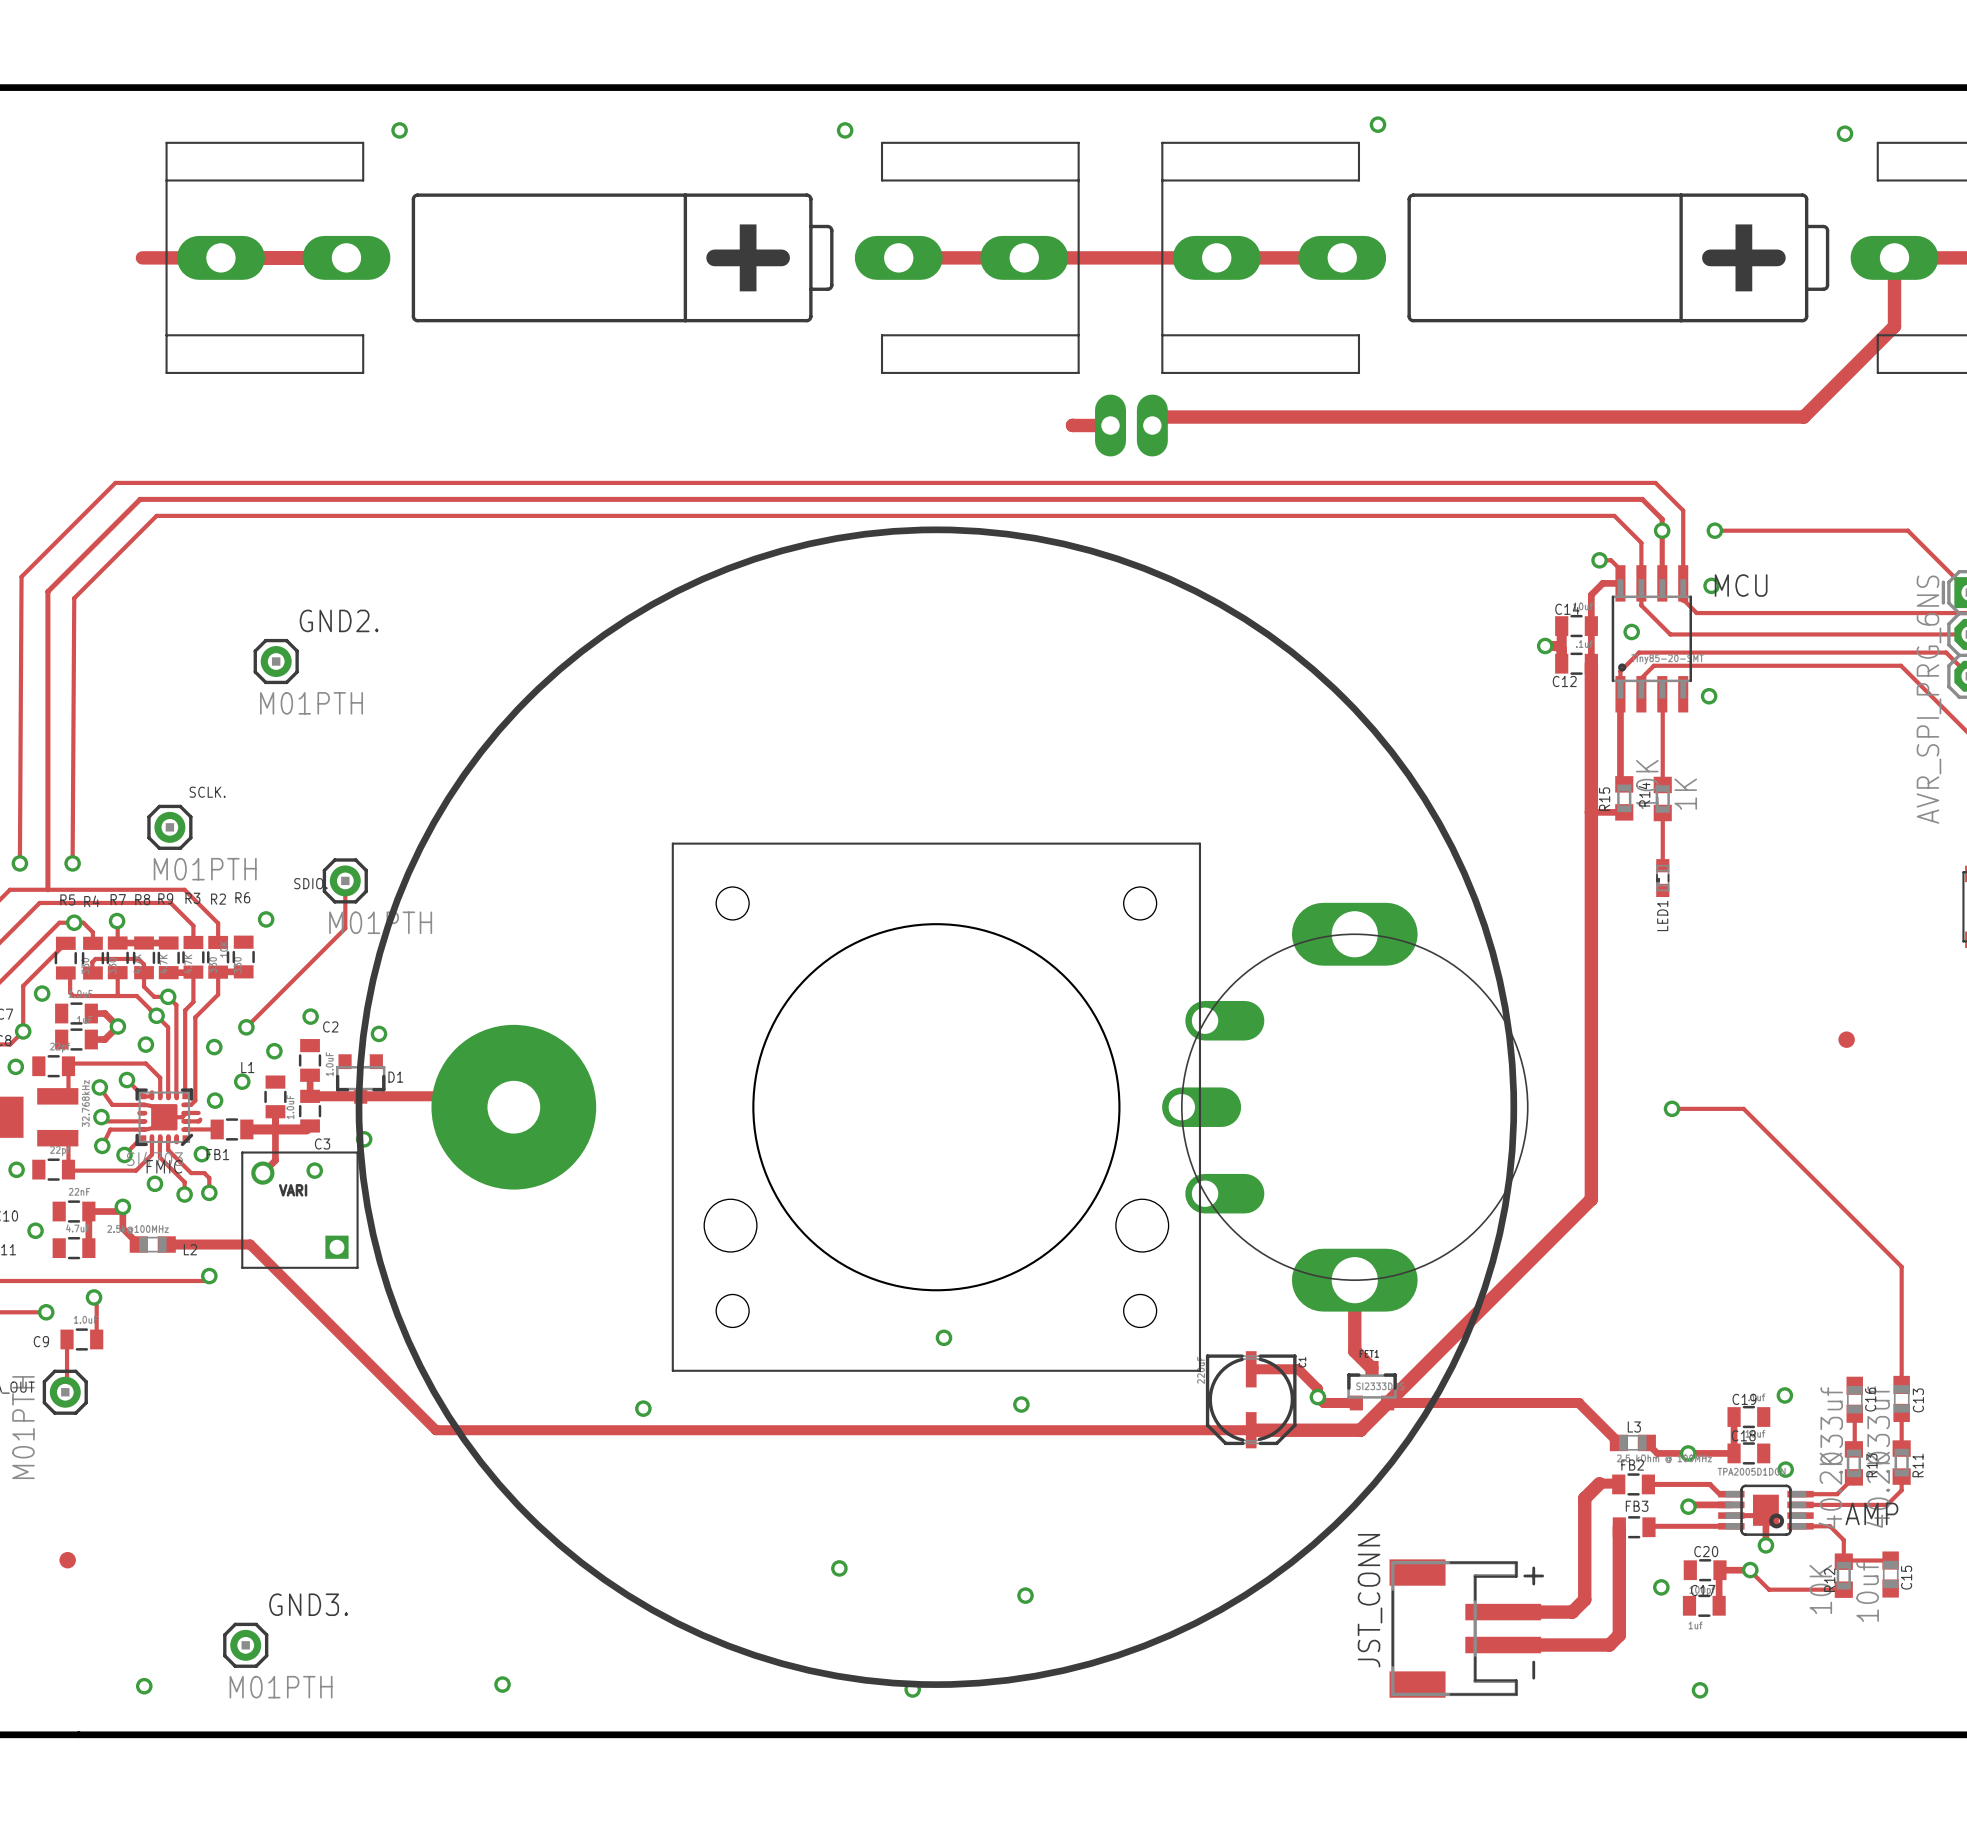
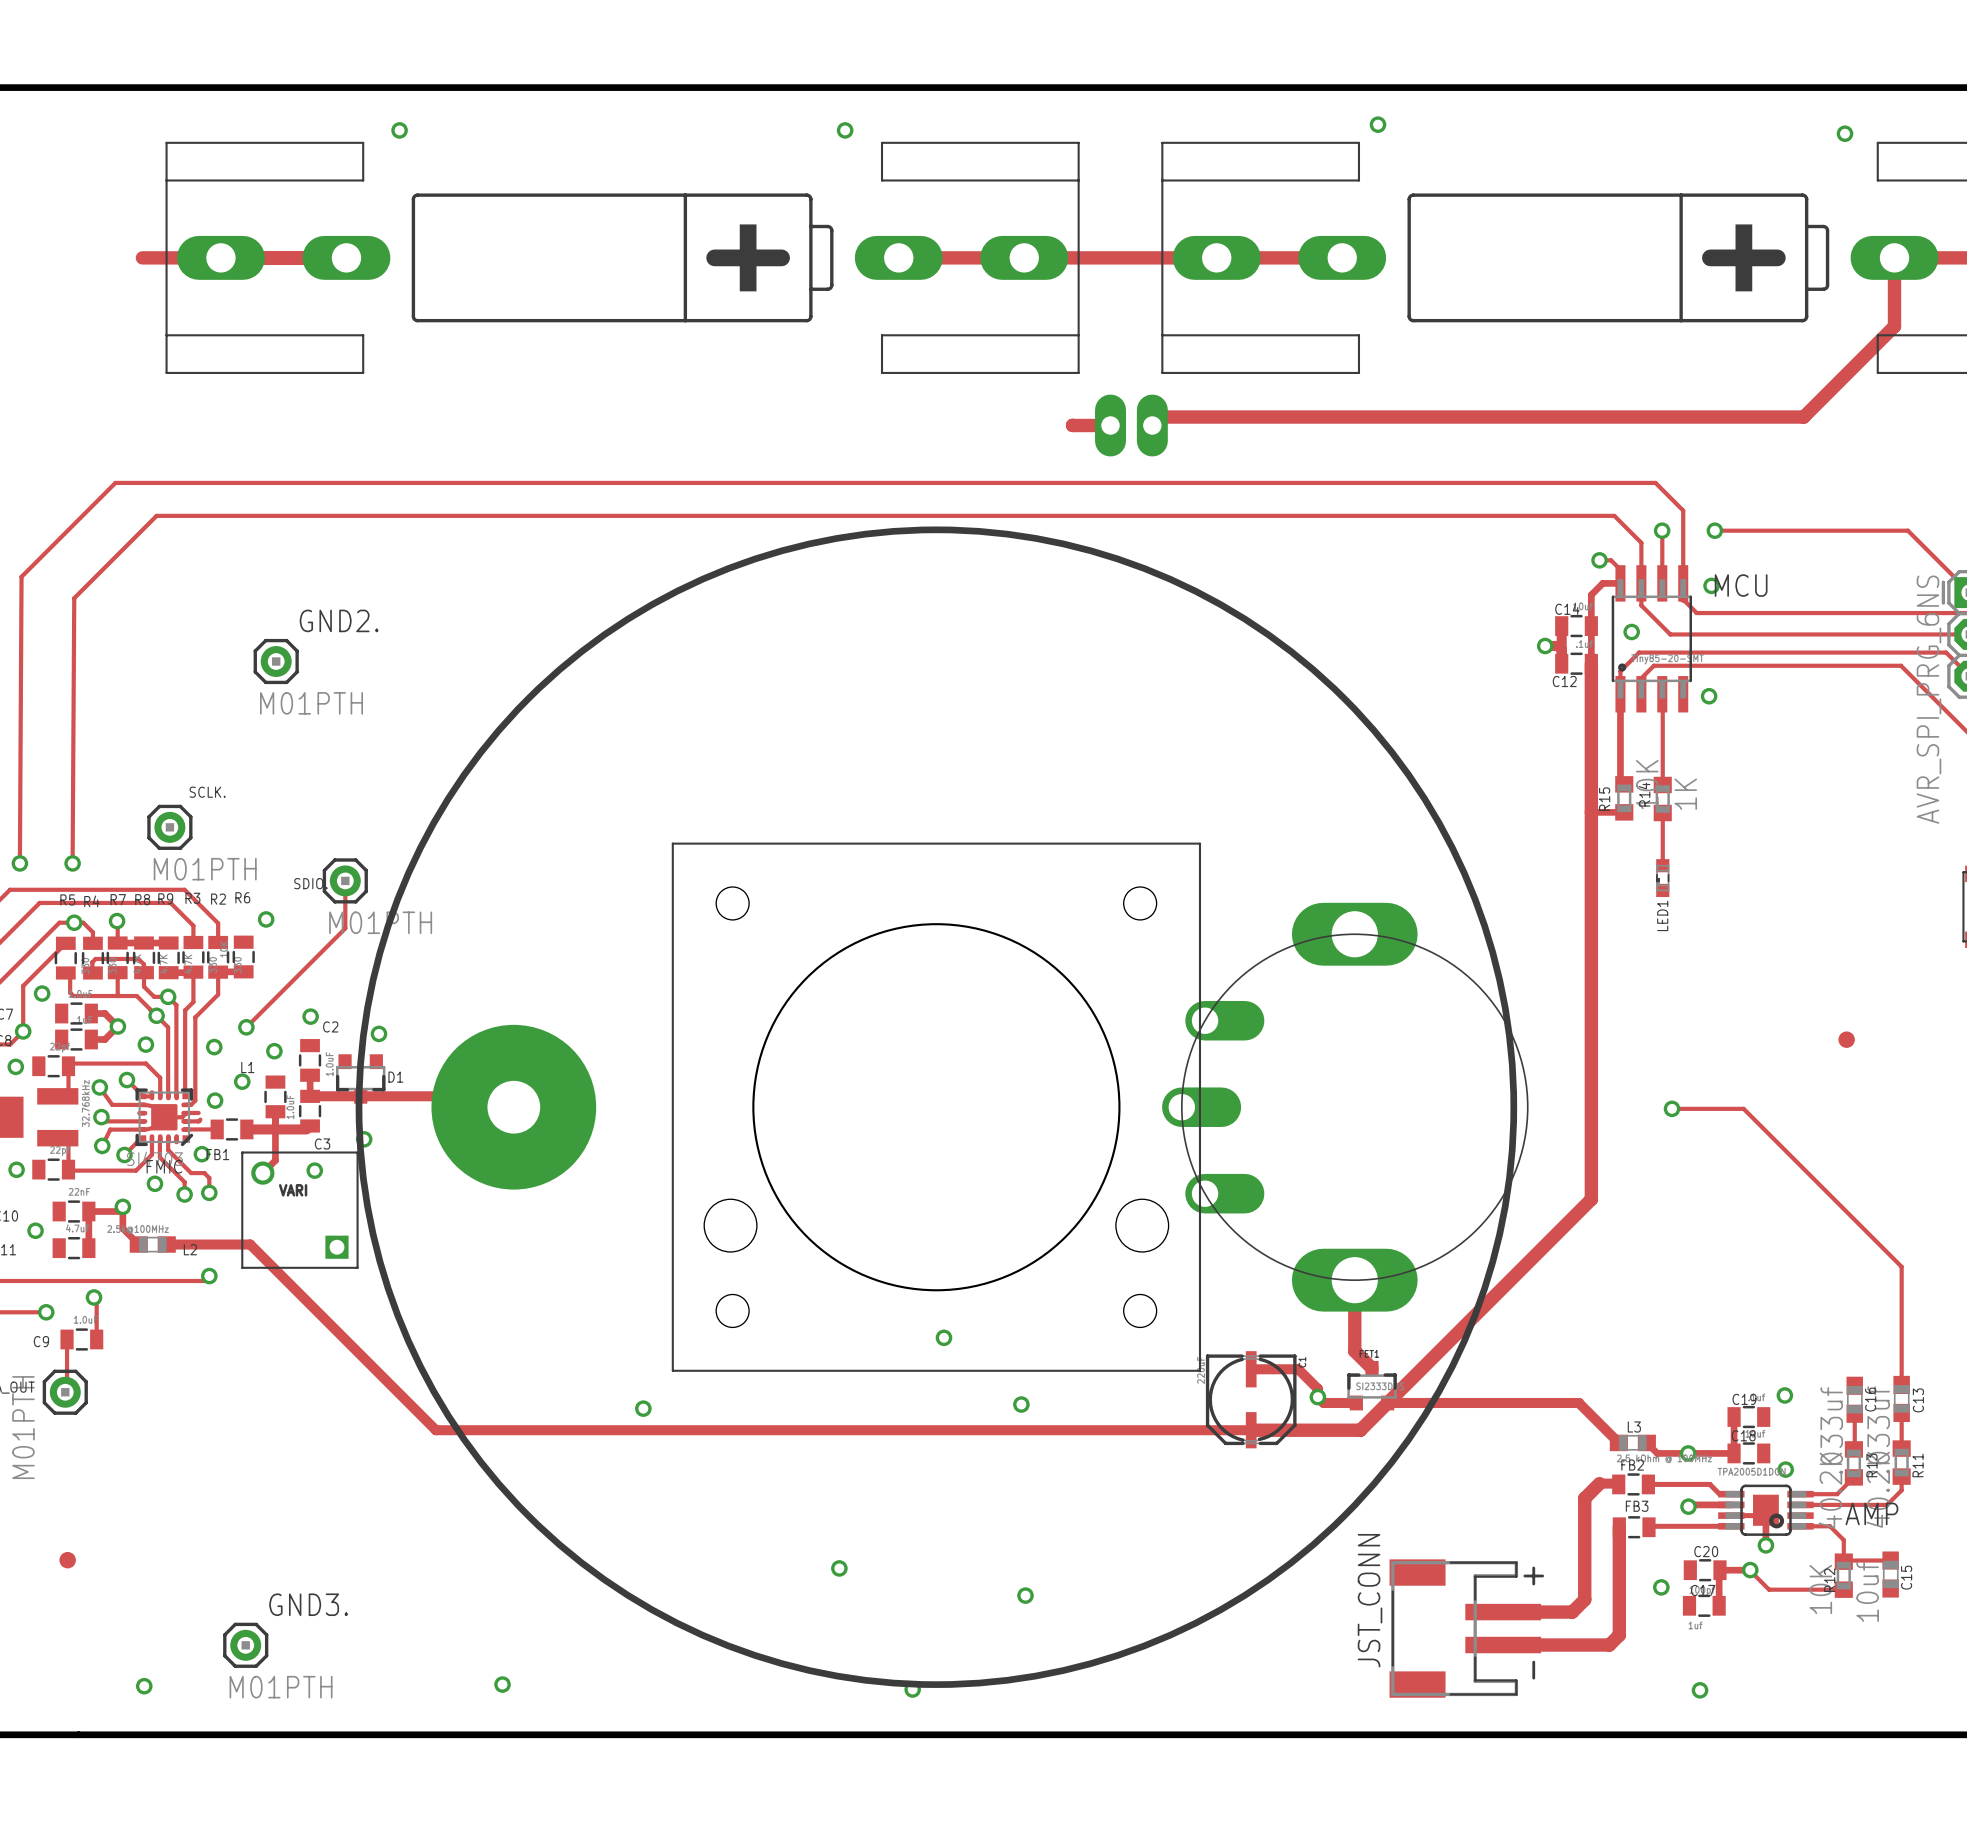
track: (1662, 583) (1662, 519) (1642, 499) (140, 499) (47, 591) (47, 889) -> none

